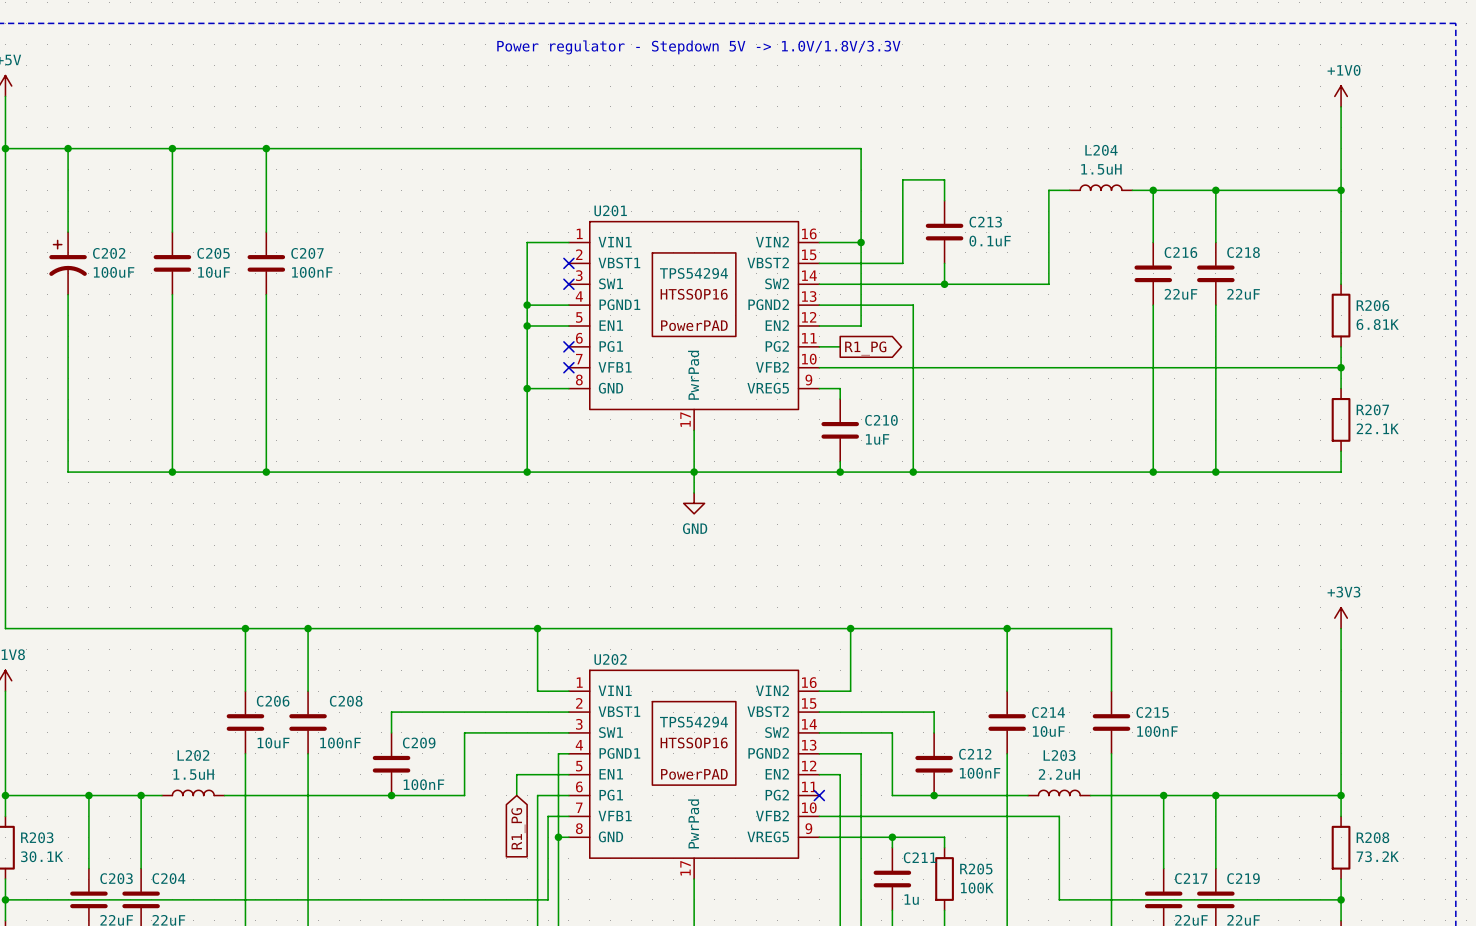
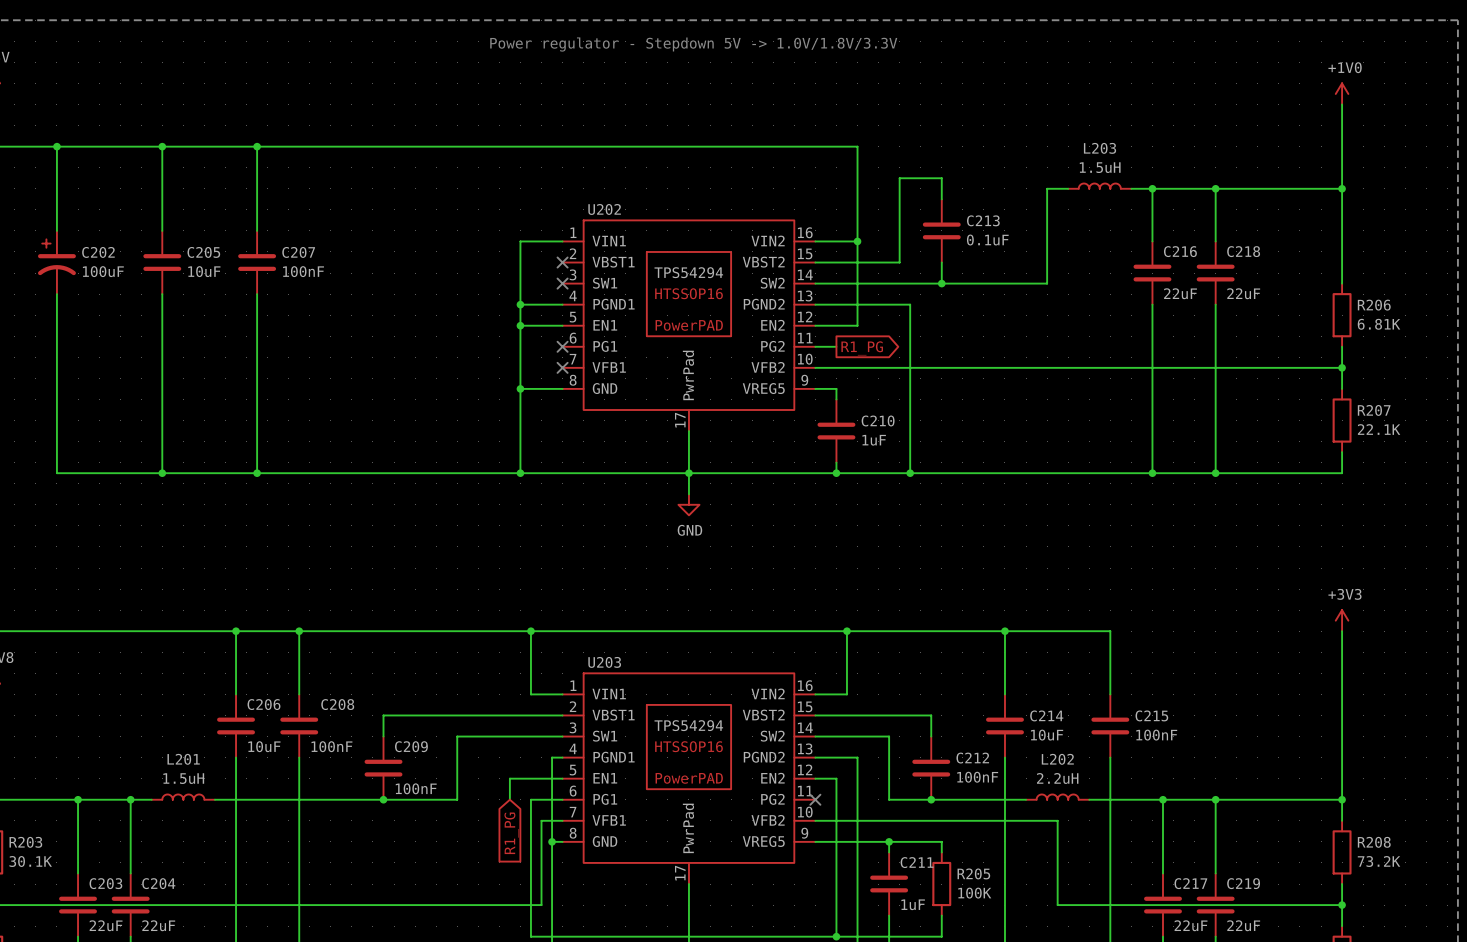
L204 name: L204 (1101, 150) -> L203 (1100, 148)
U201 name: U201 (610, 210) -> U202 (604, 209)
U202 name: U202 (610, 659) -> U203 (604, 662)
L202 name: L202 (193, 755) -> L201 (183, 759)
L203 name: L203 (1059, 755) -> L202 (1057, 759)
C211 value: 1u (911, 899) -> 1uF (913, 904)

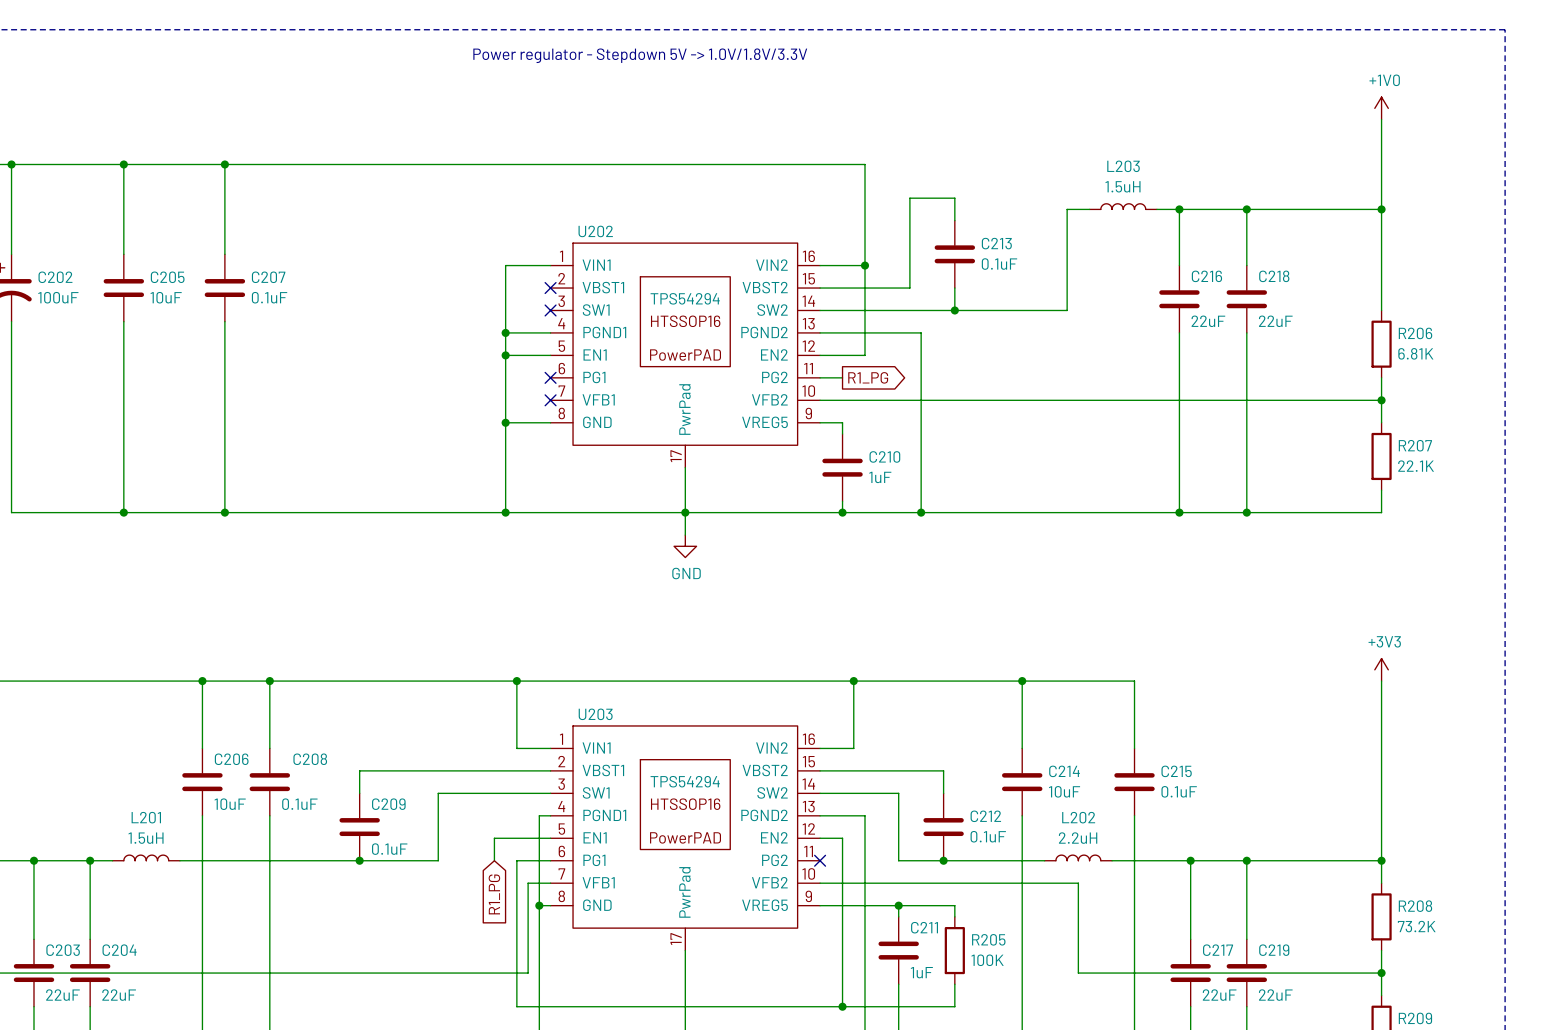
C207 value: 100nF (303, 271) -> 0.1uF (269, 297)
C215 value: 100nF (1156, 735) -> 0.1uF (1179, 791)
C208 value: 100nF (331, 746) -> 0.1uF (299, 804)
C212 value: 100nF (977, 777) -> 0.1uF (988, 836)
C209 value: 100nF (416, 788) -> 0.1uF (389, 849)

